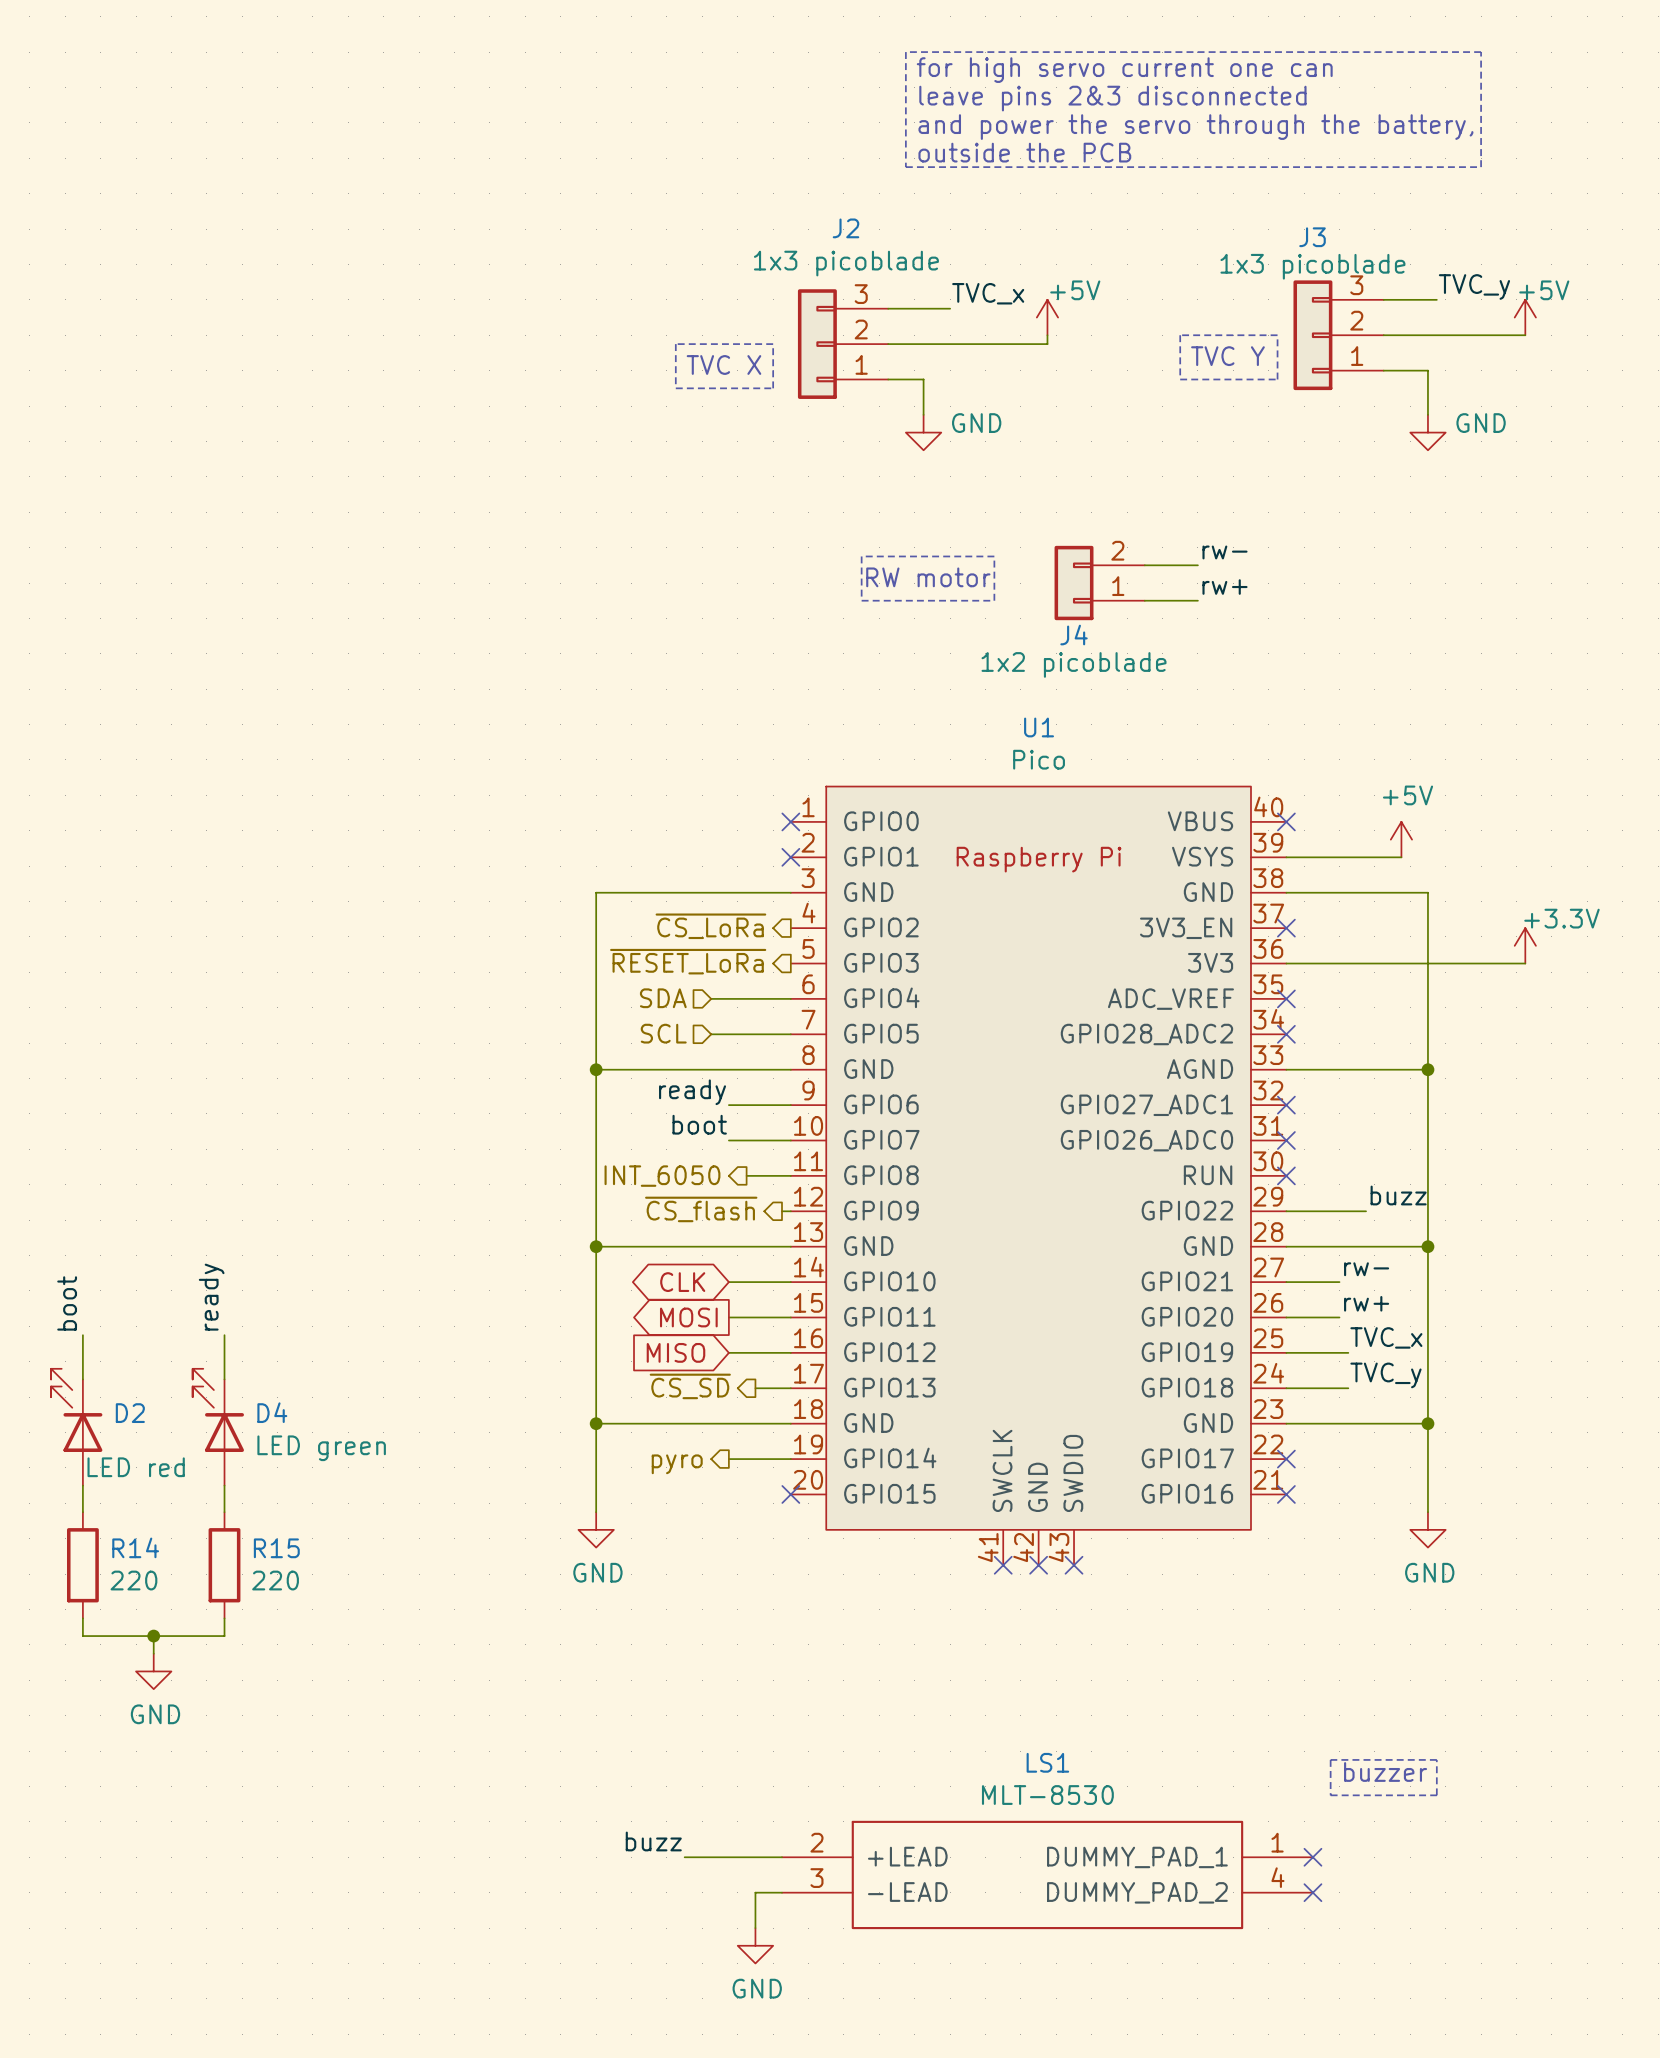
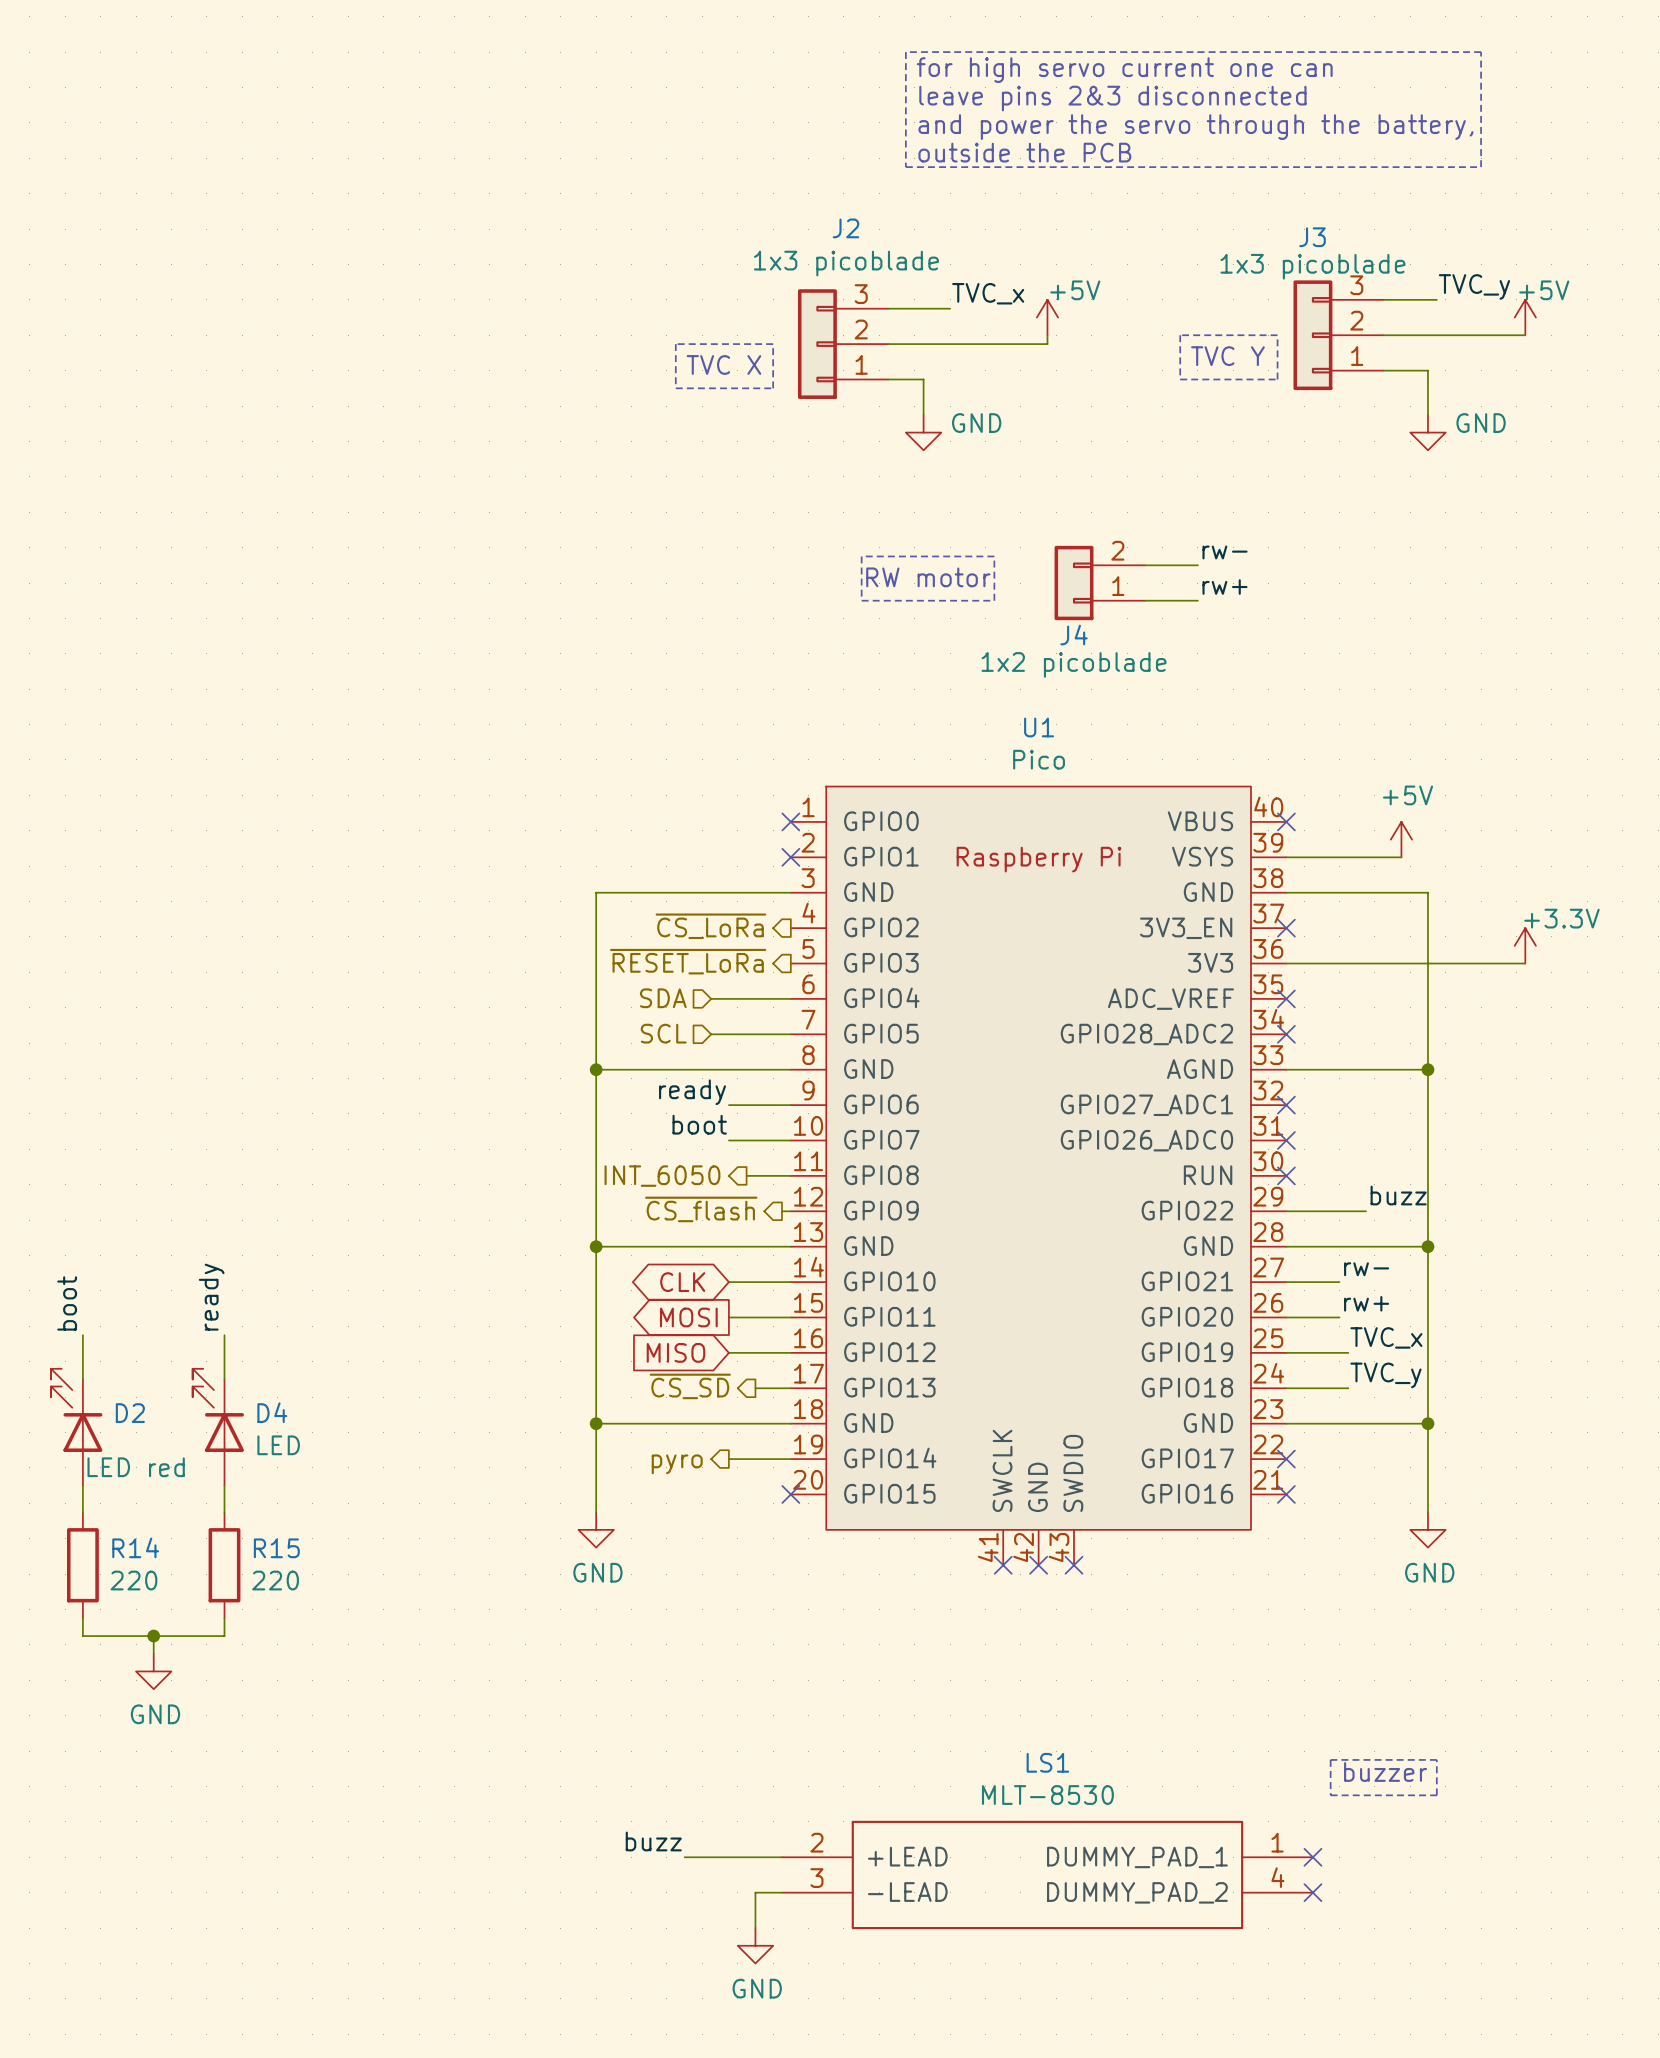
D4 value: LED green (321, 1448) -> LED (278, 1445)

